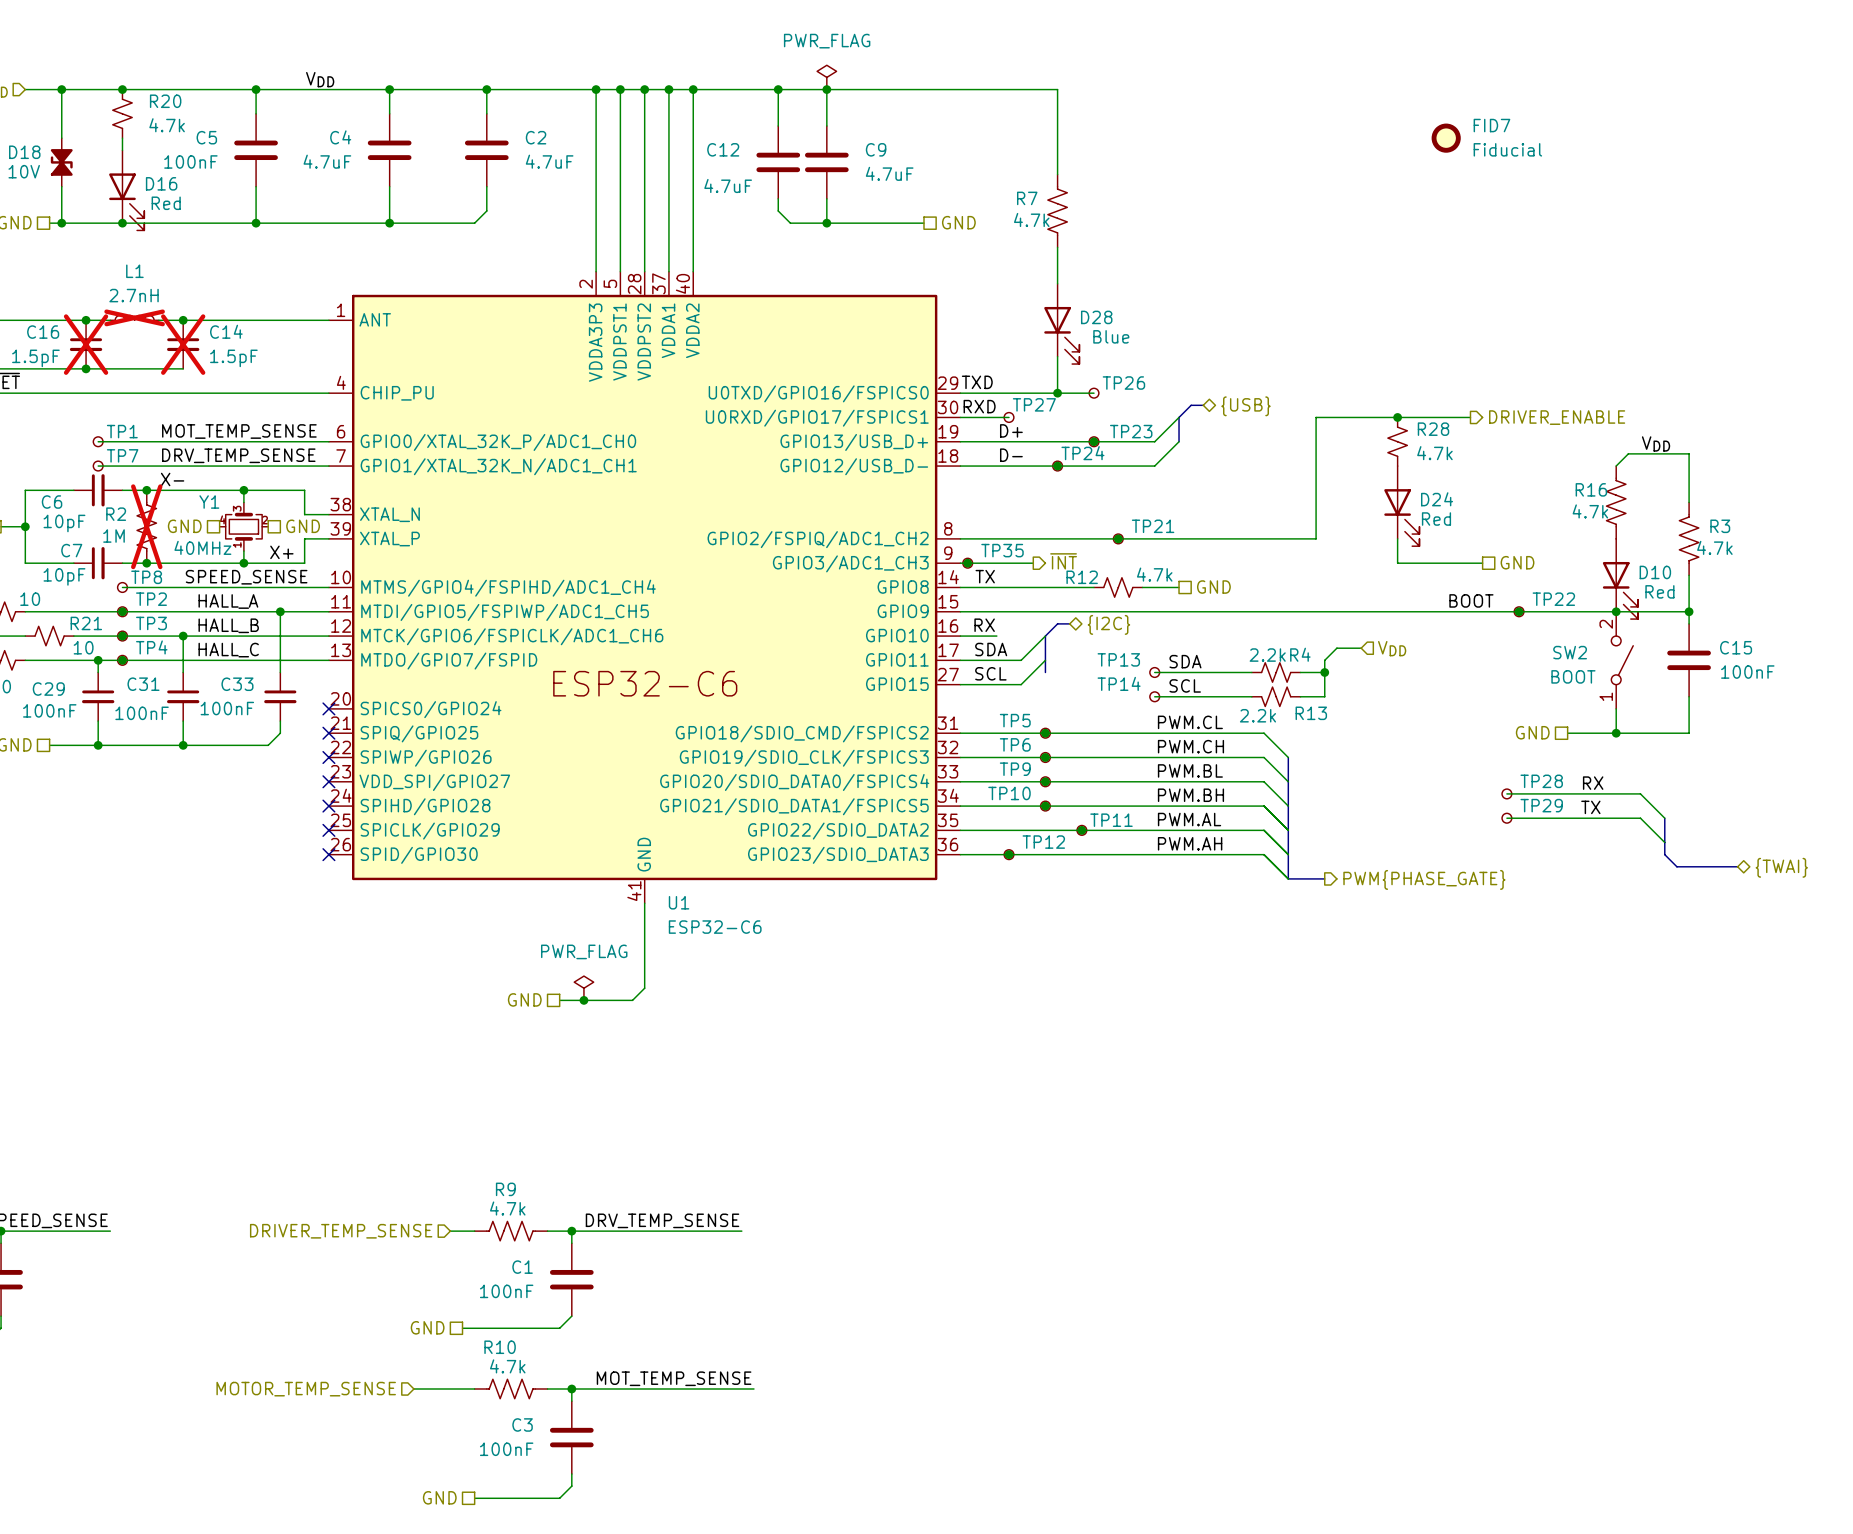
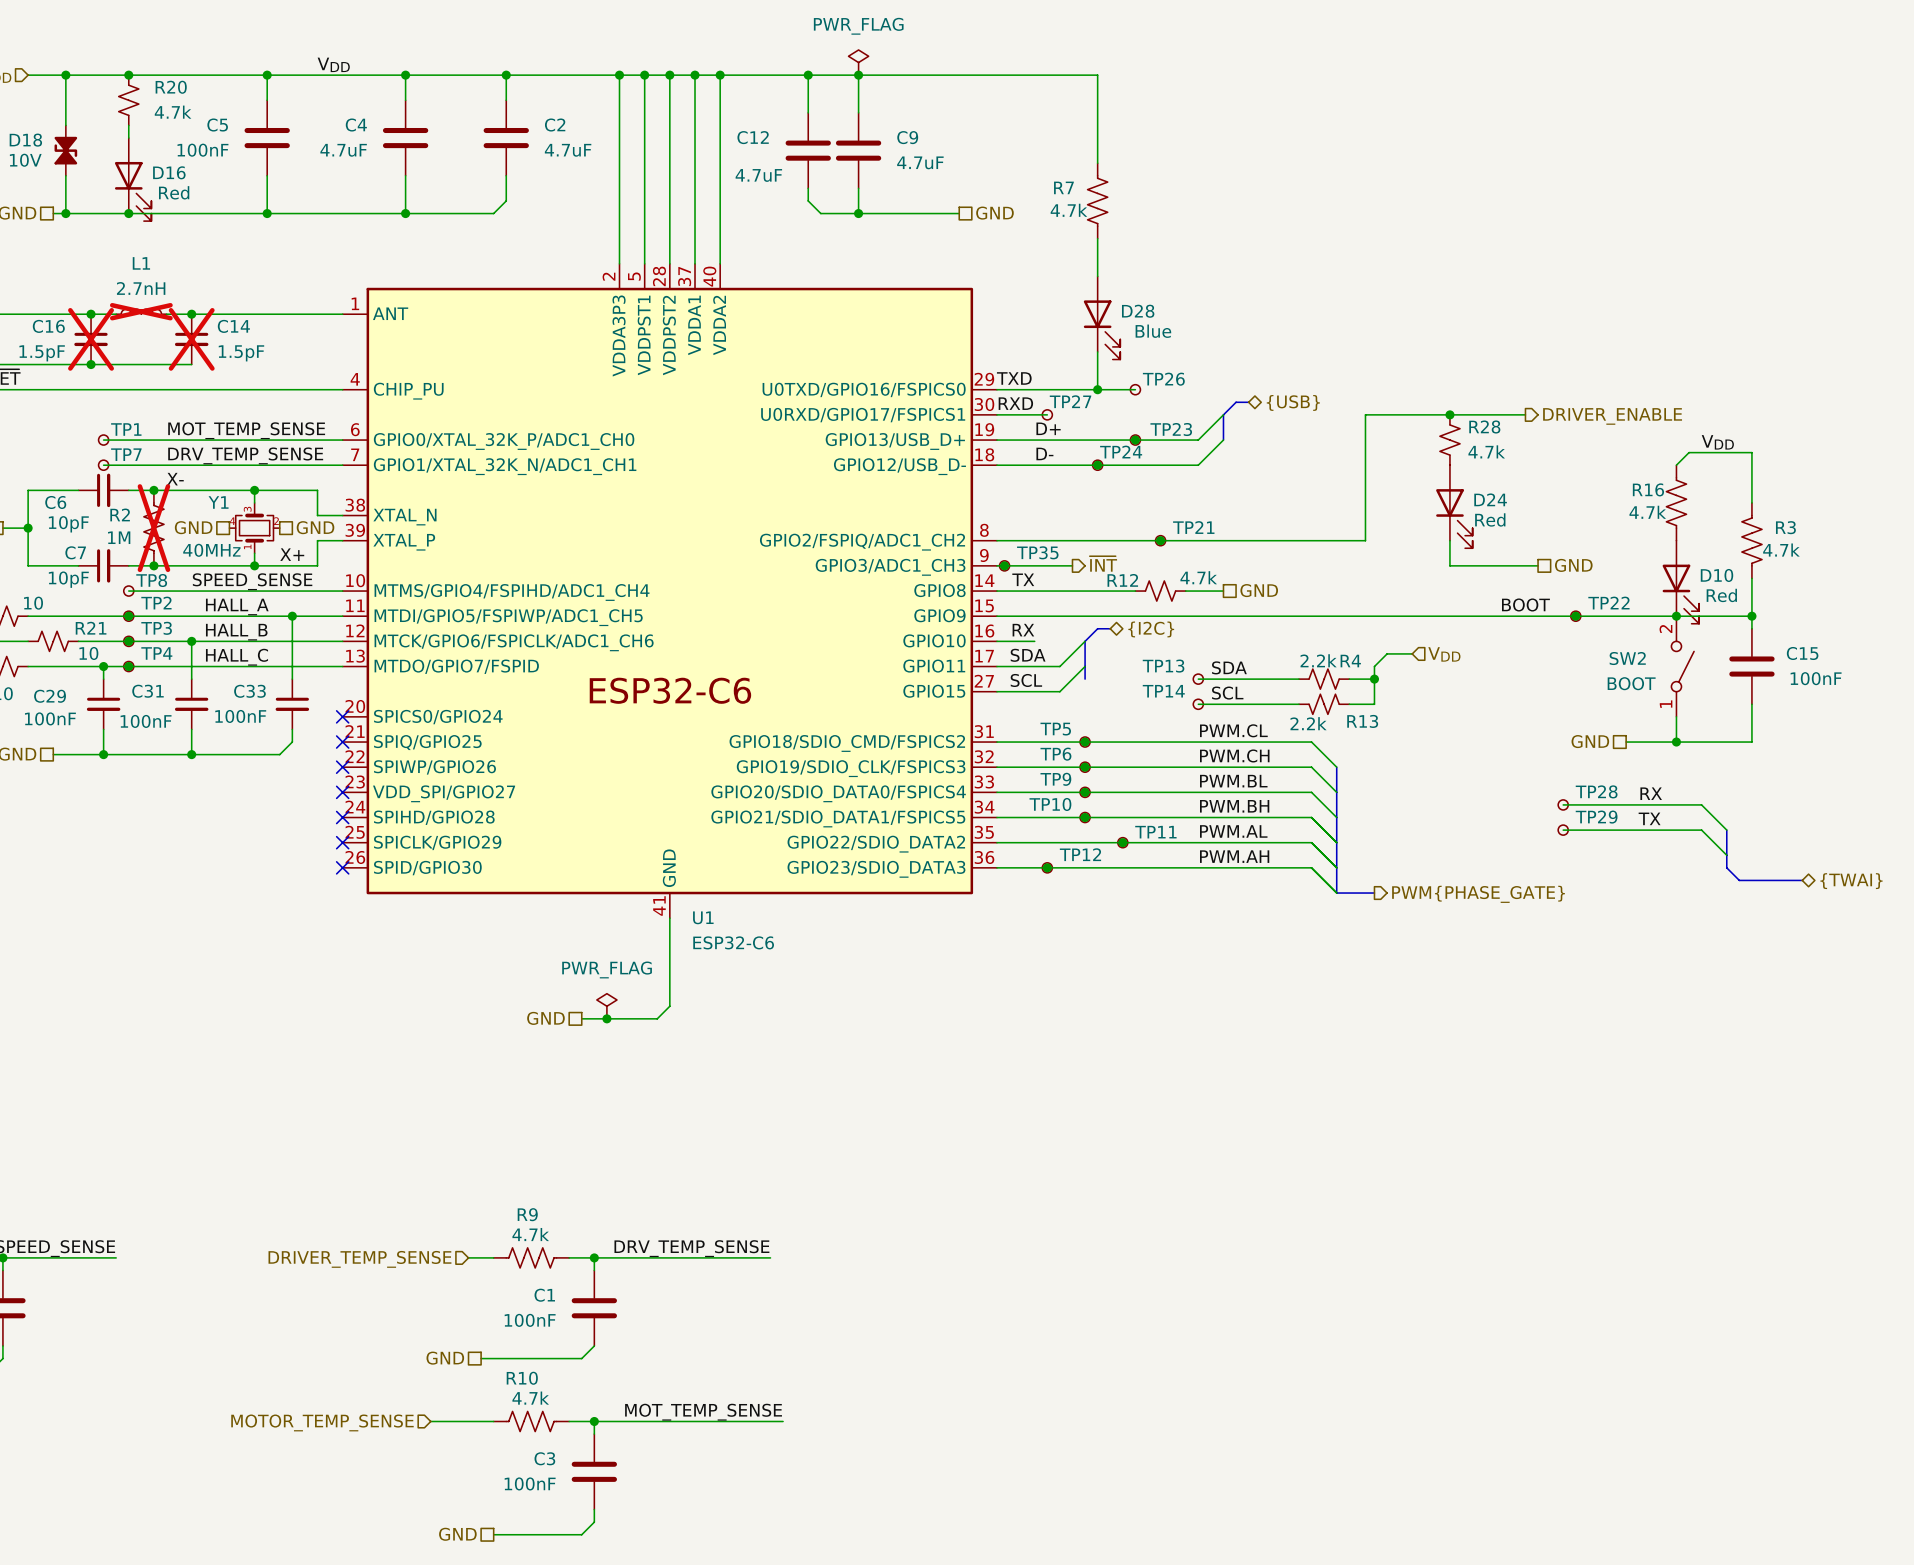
FID7: Fiducial (1446, 138) -> none

